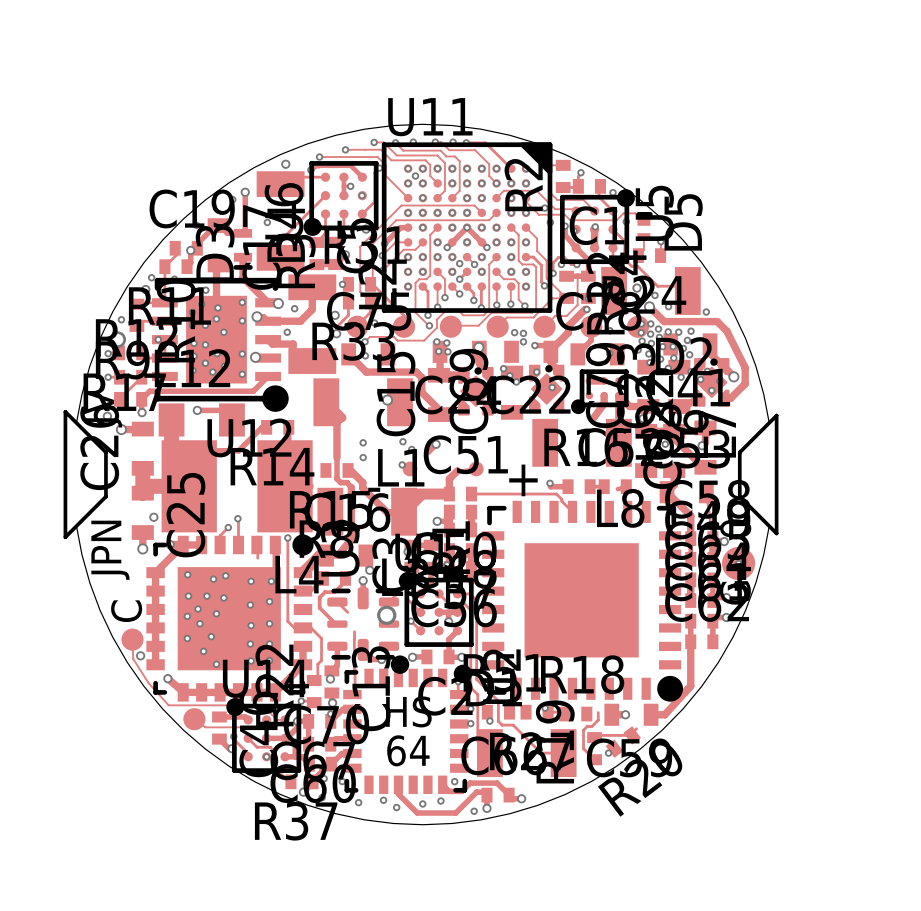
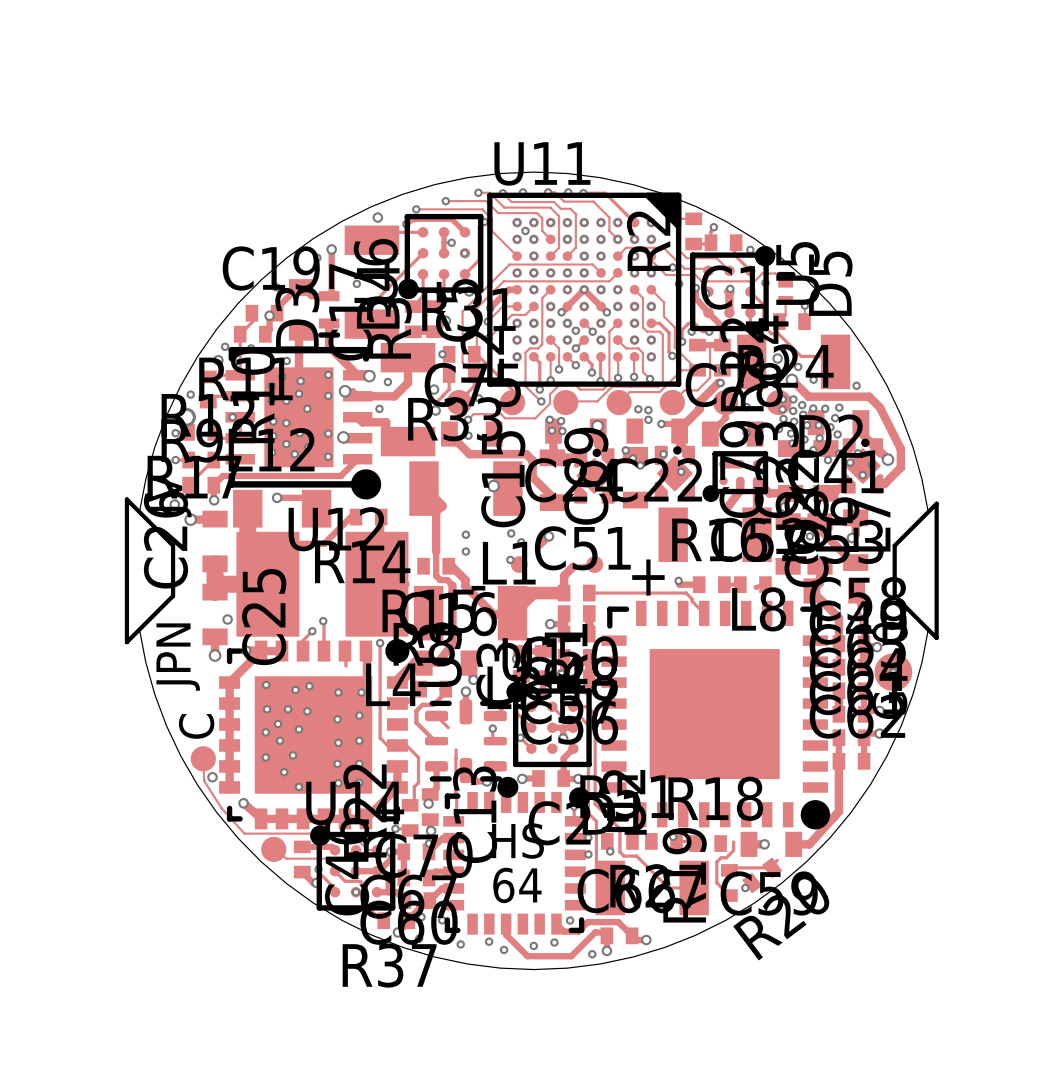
via: (386, 615) -> none

